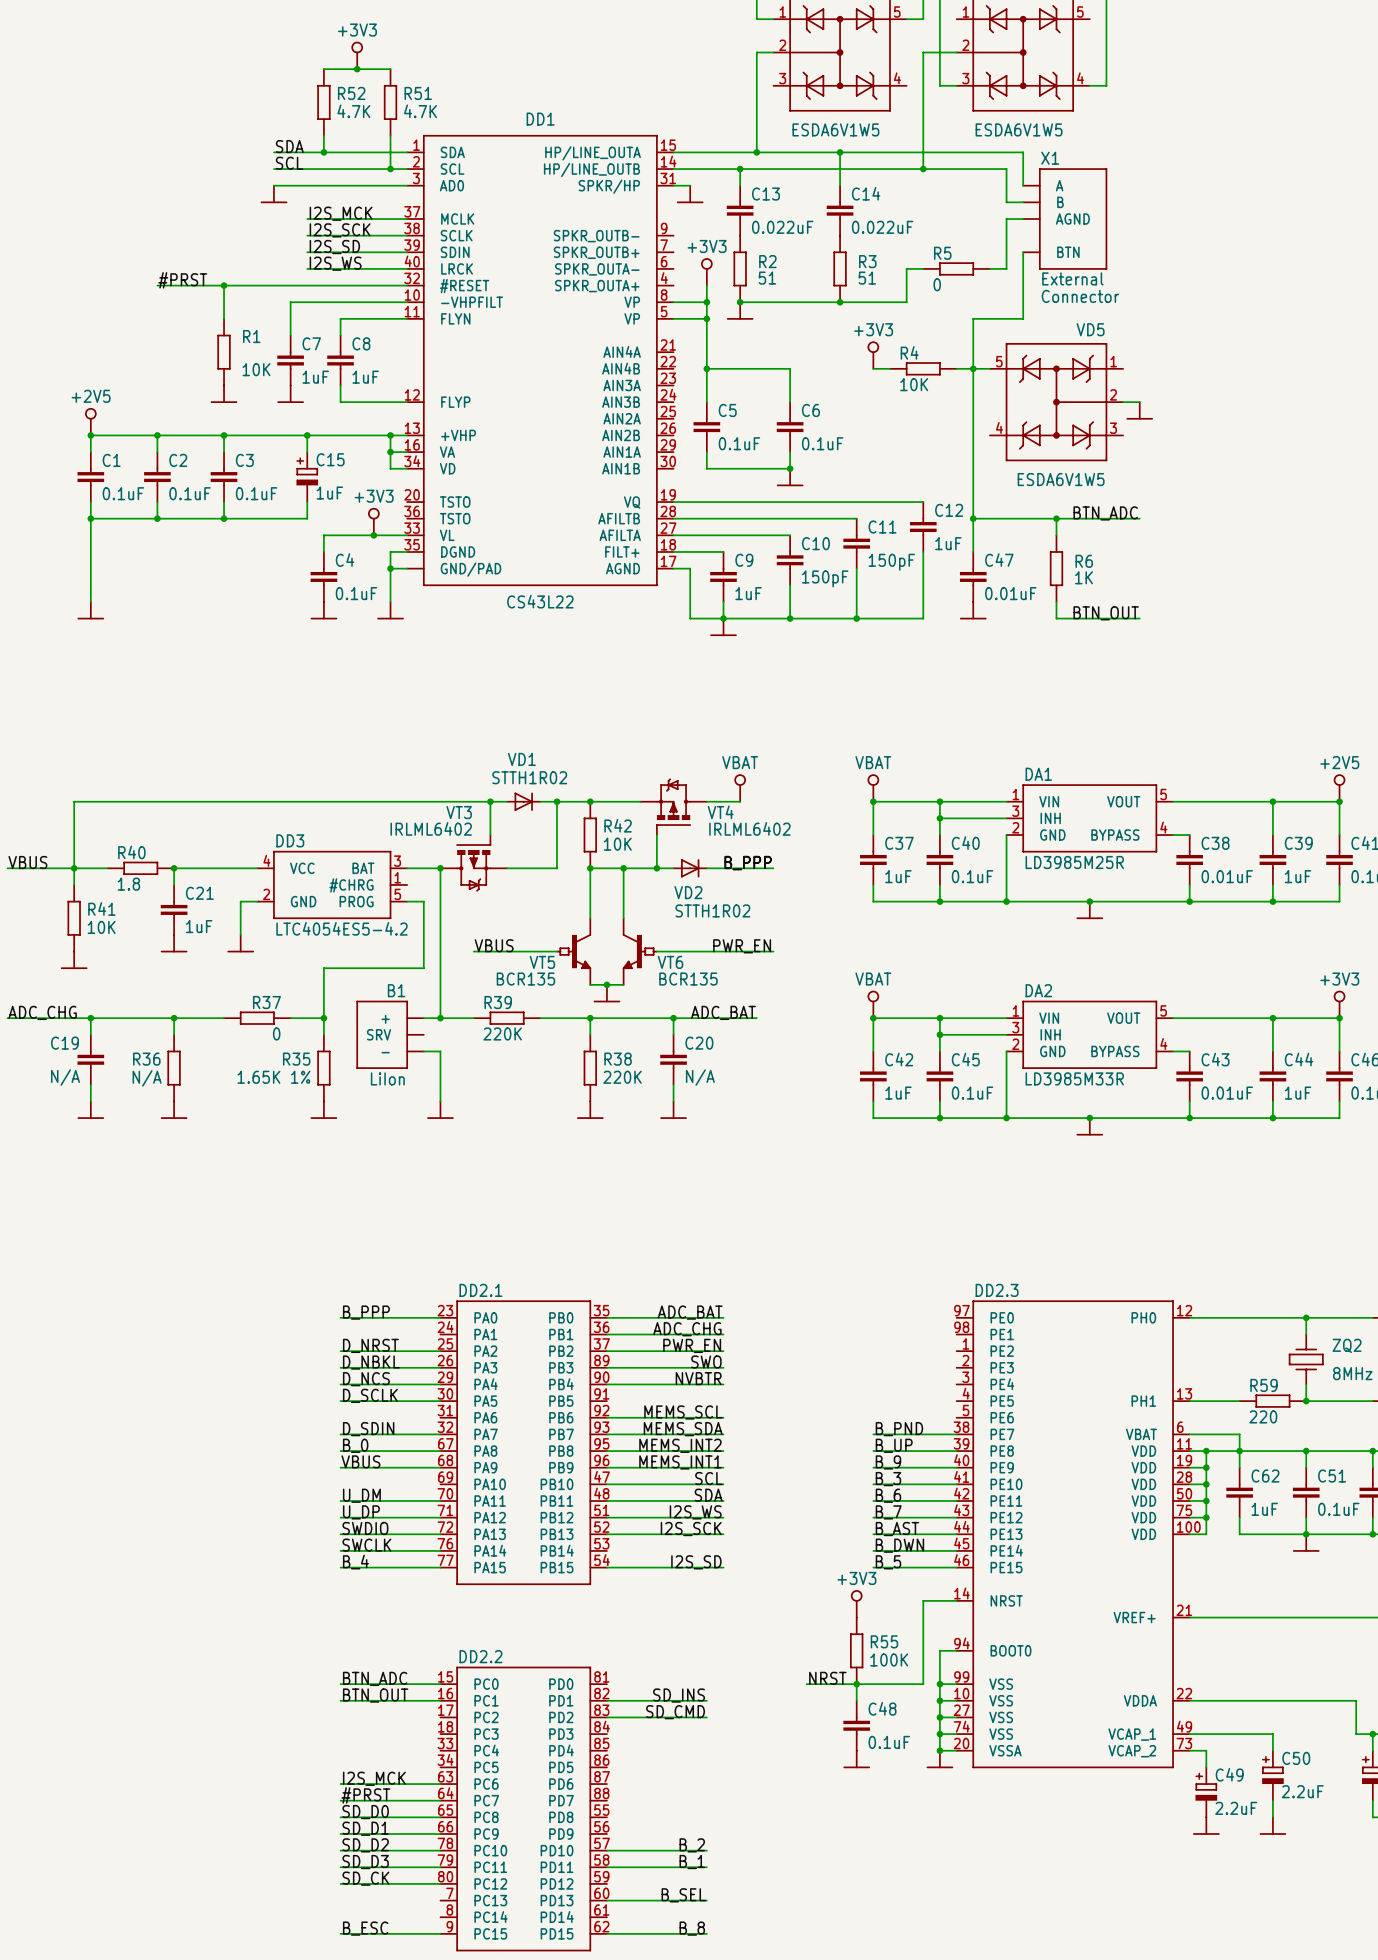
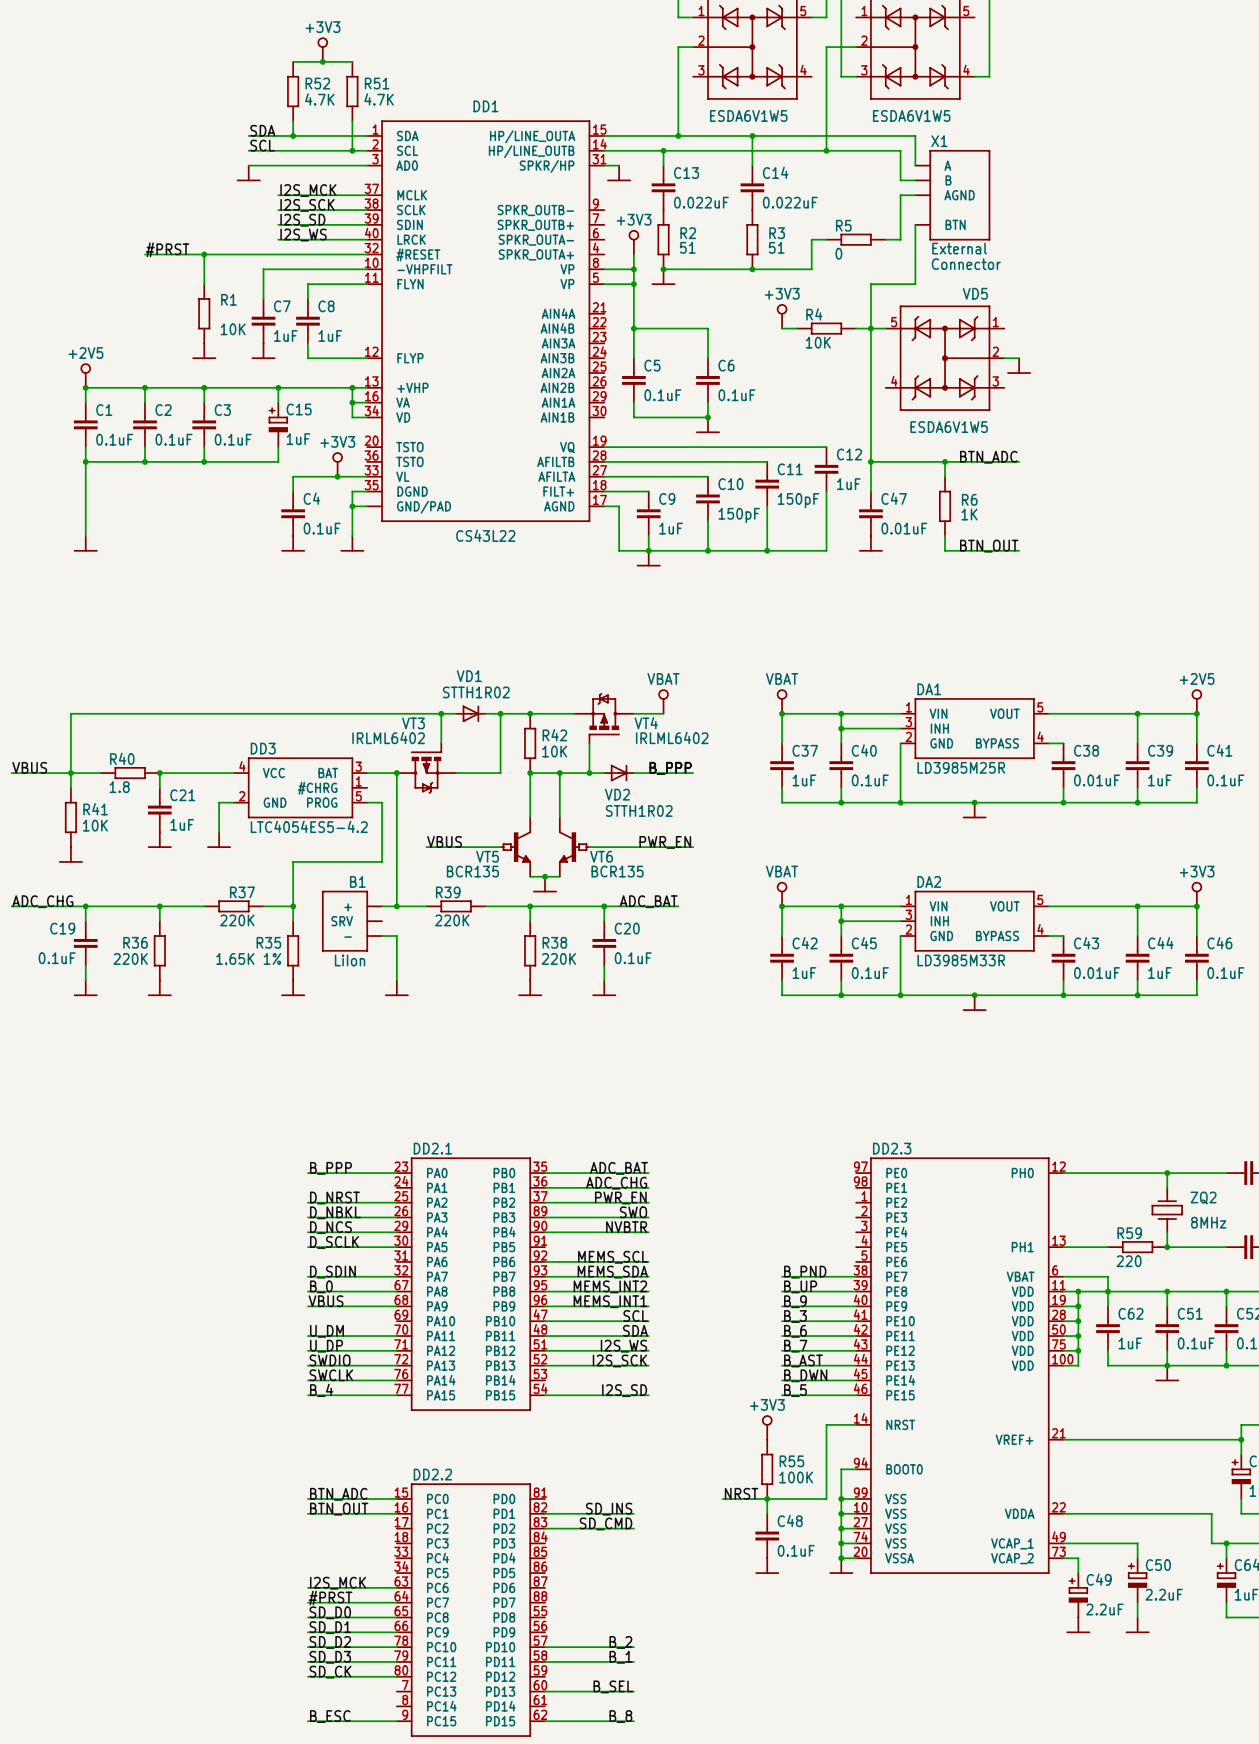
R37 value: 0 (276, 1033) -> 220K (237, 920)
C19 value: N/A (65, 1077) -> 0.1uF (57, 958)
C20 value: N/A (700, 1077) -> 0.1uF (633, 958)
R36 value: N/A (147, 1078) -> 220K (130, 958)

